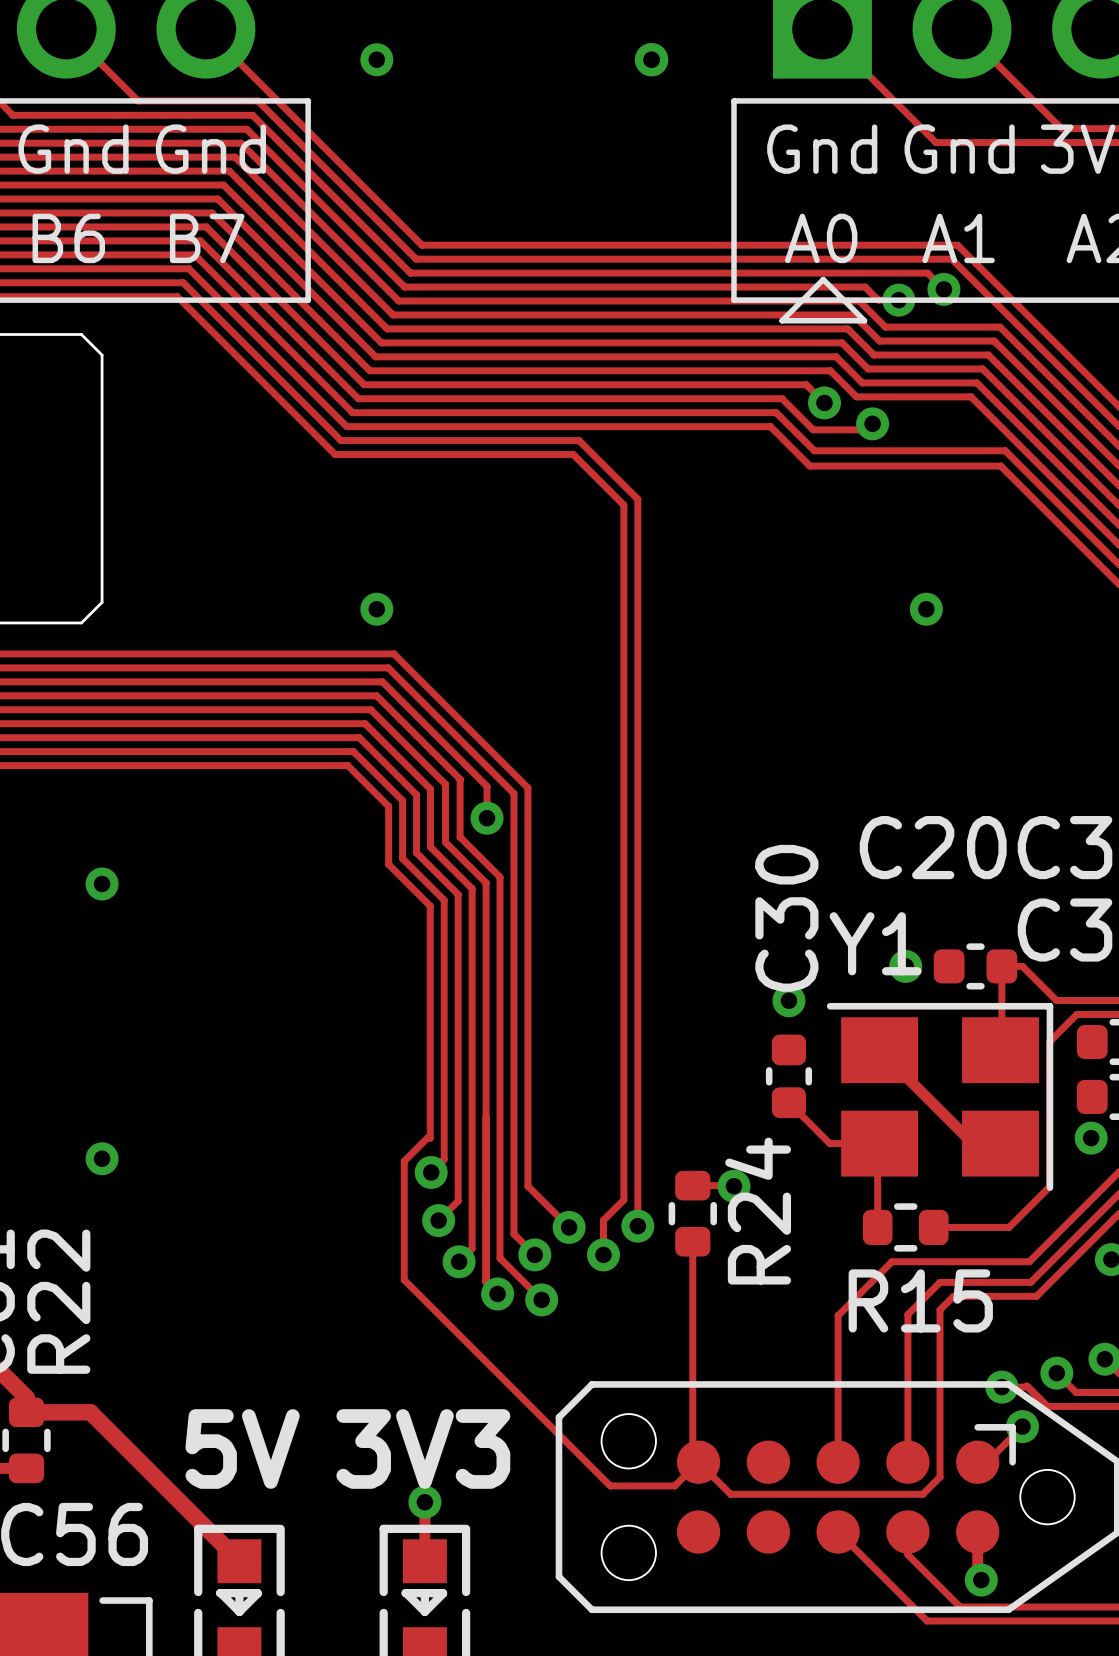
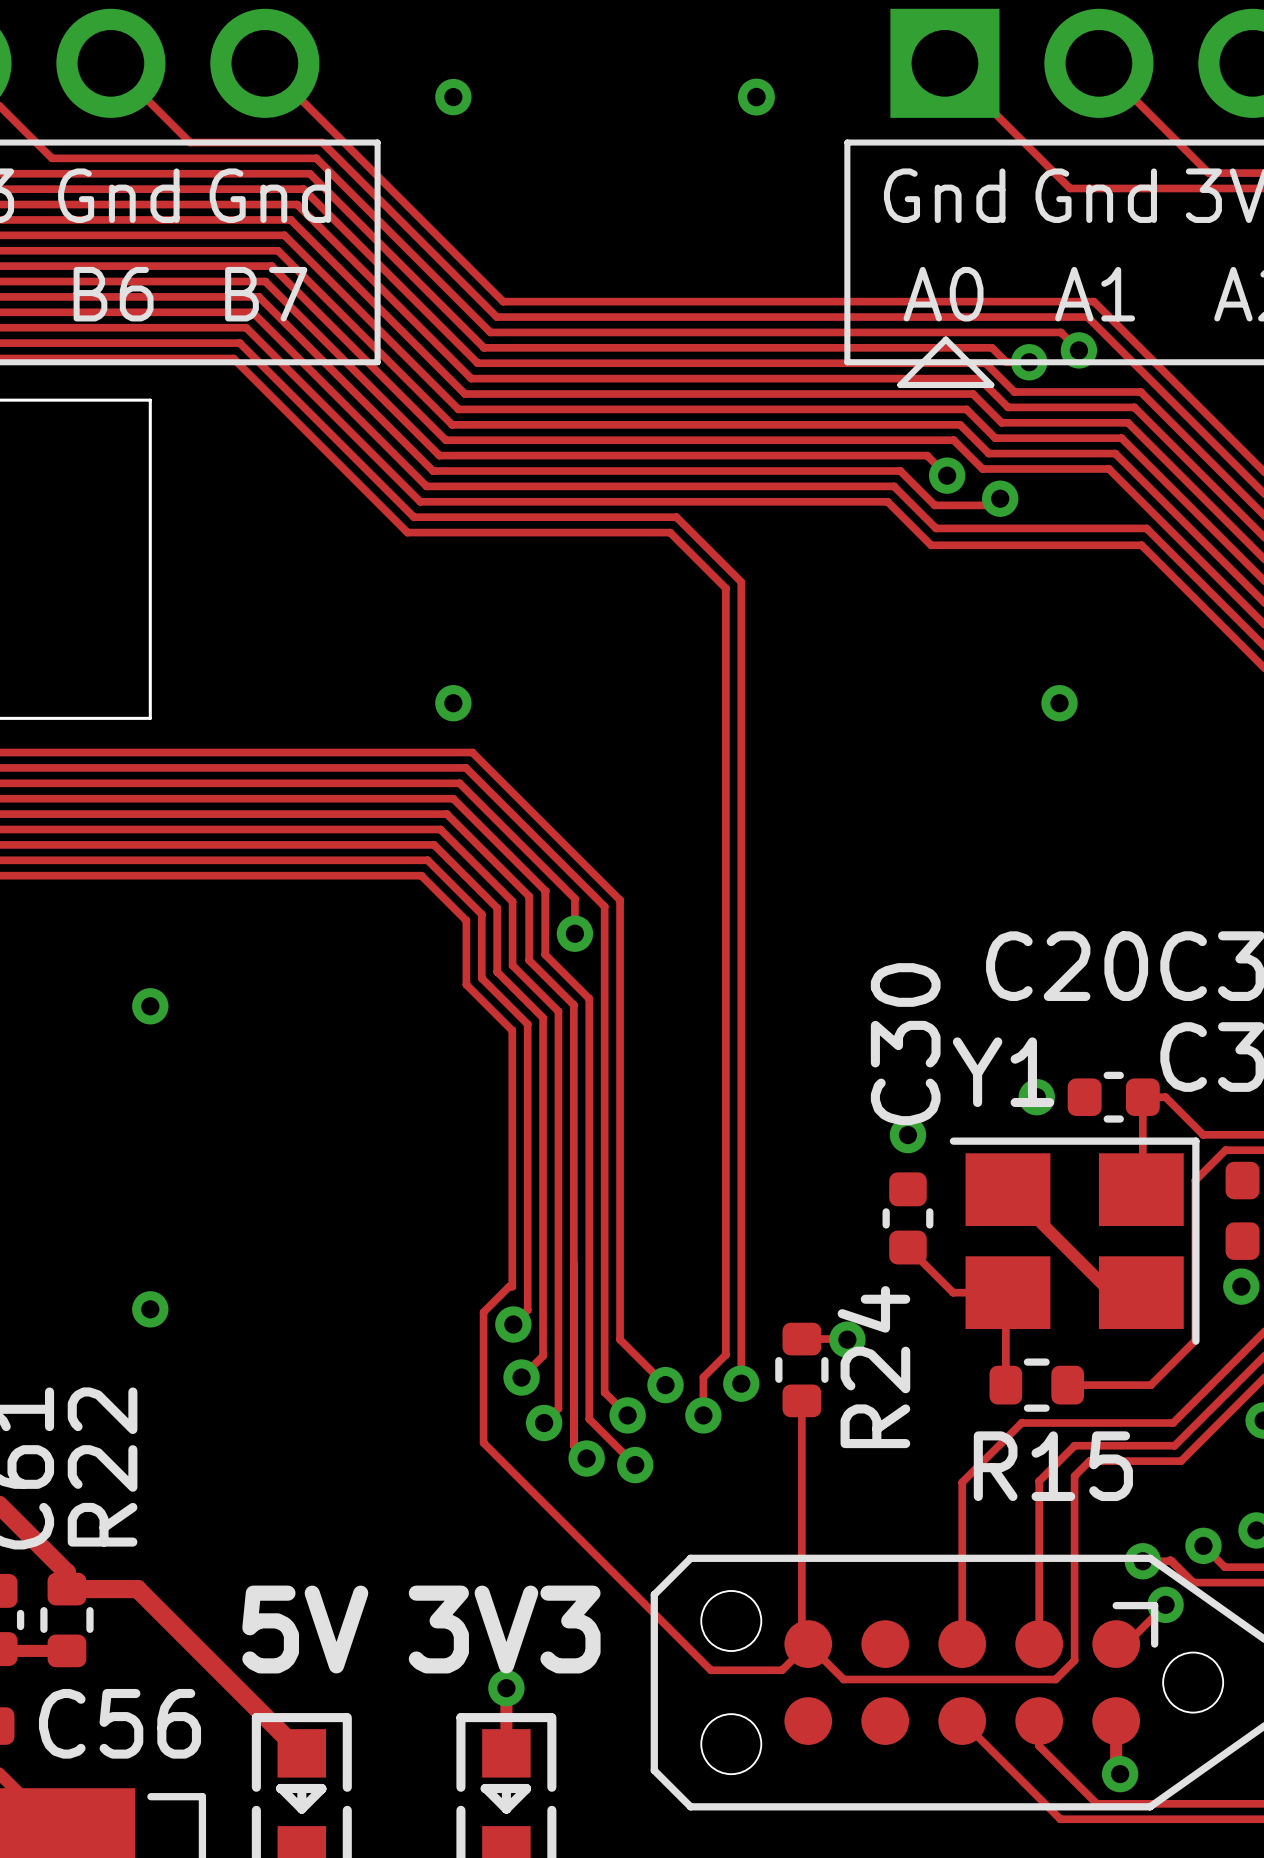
board edge: (81, 334) (102, 355) -> (127, 400) (150, 400) (150, 422)
board edge: (102, 602) (81, 622) -> (150, 695) (150, 718) (127, 718)

